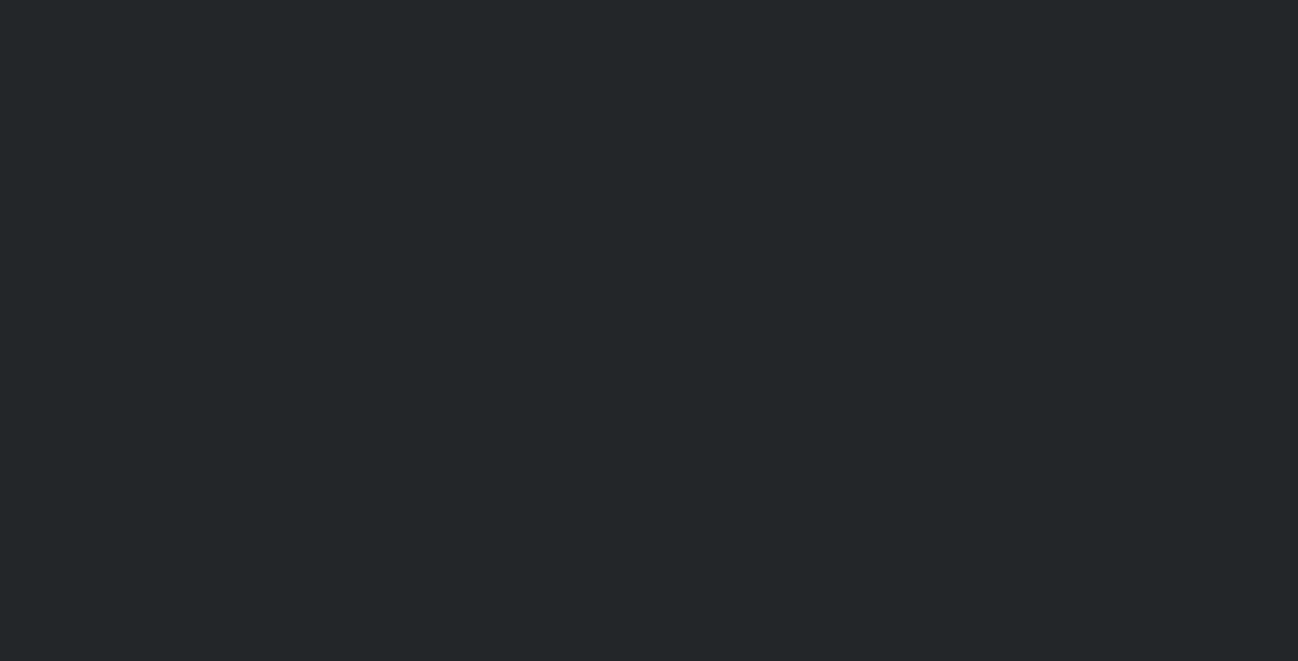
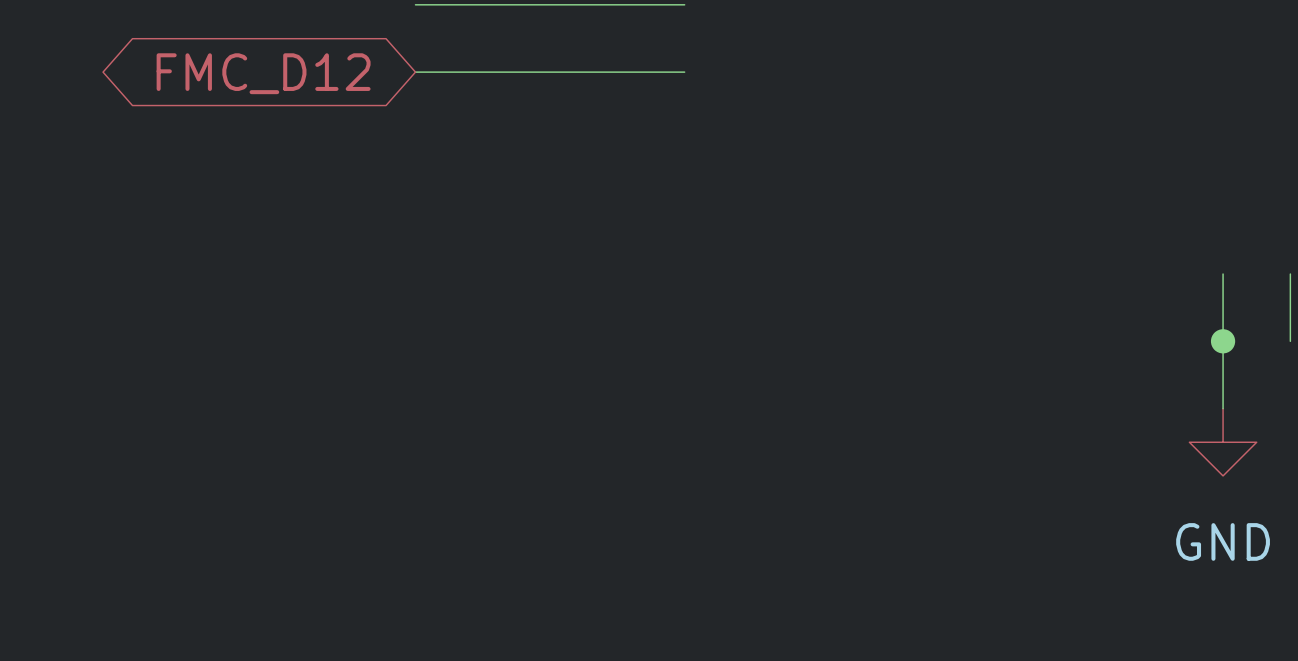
wire: none -> (415, 4) (684, 4)
wire: none -> (415, 72) (684, 72)
global label: none -> FMC_D12 (263, 73)
wire: none -> (1223, 274) (1223, 408)
wire: none -> (1290, 274) (1290, 341)
junction: none -> (1223, 341)
power symbol: none -> GND (1223, 442)

